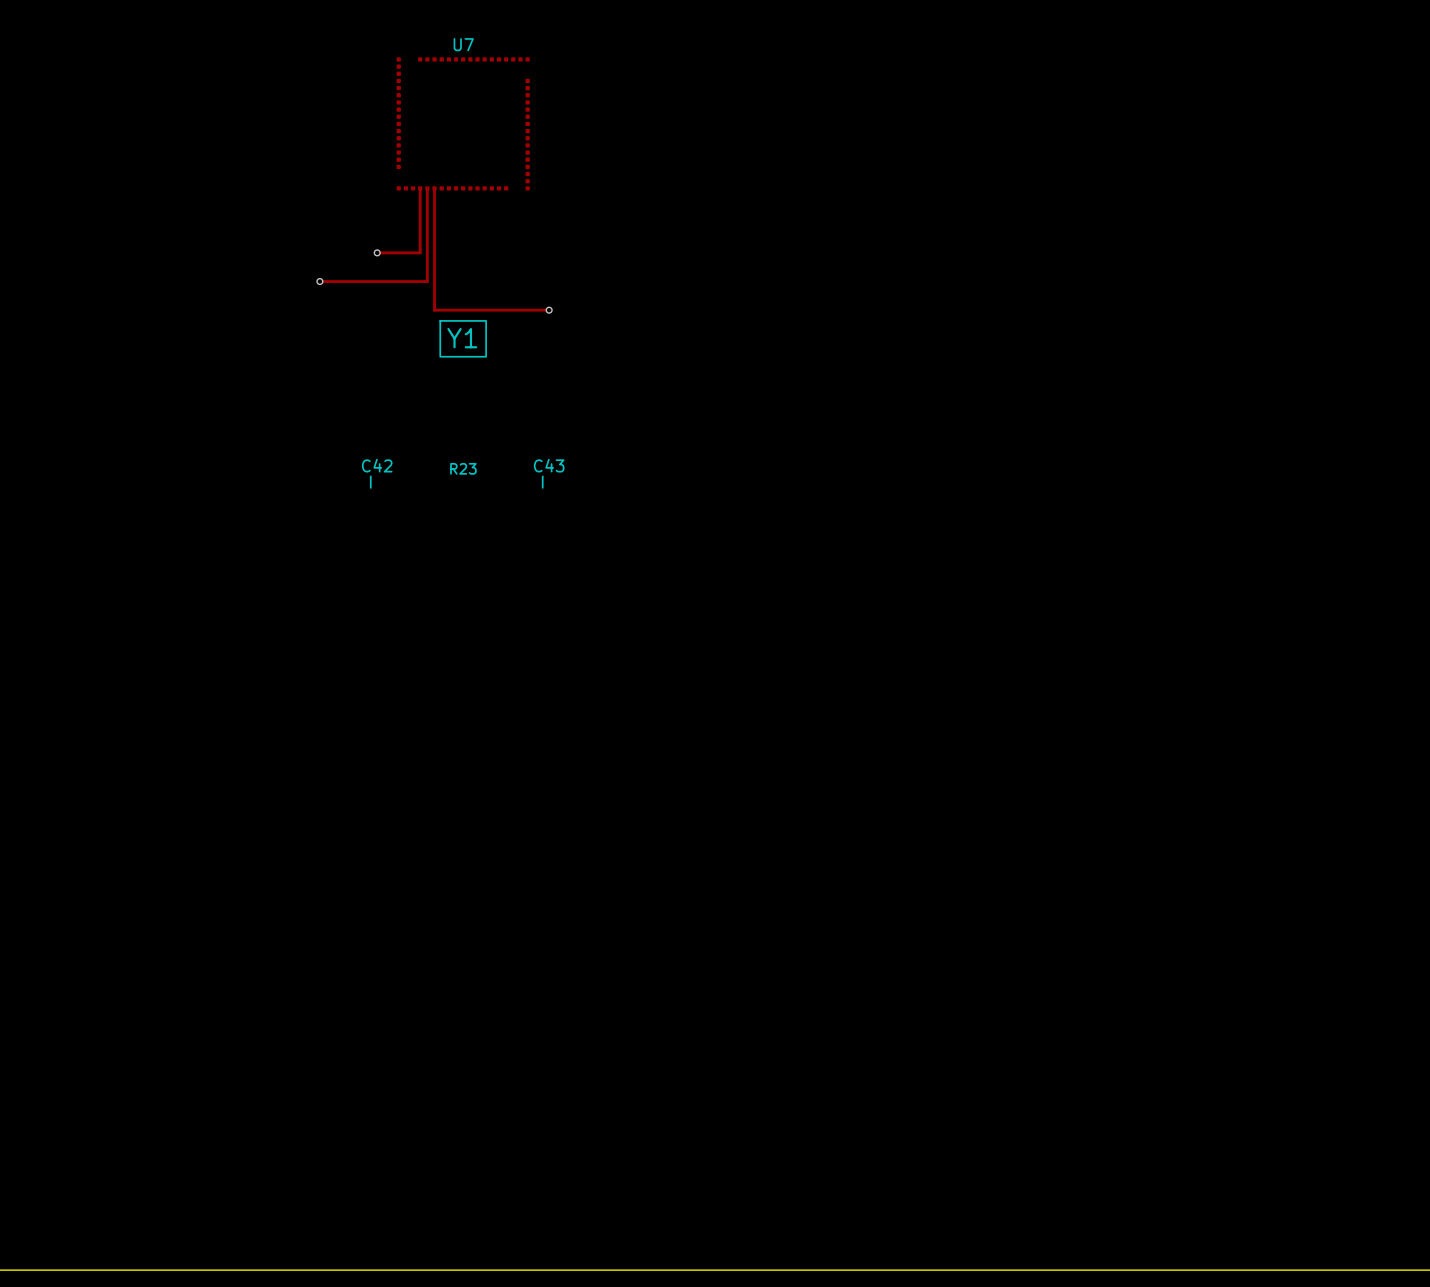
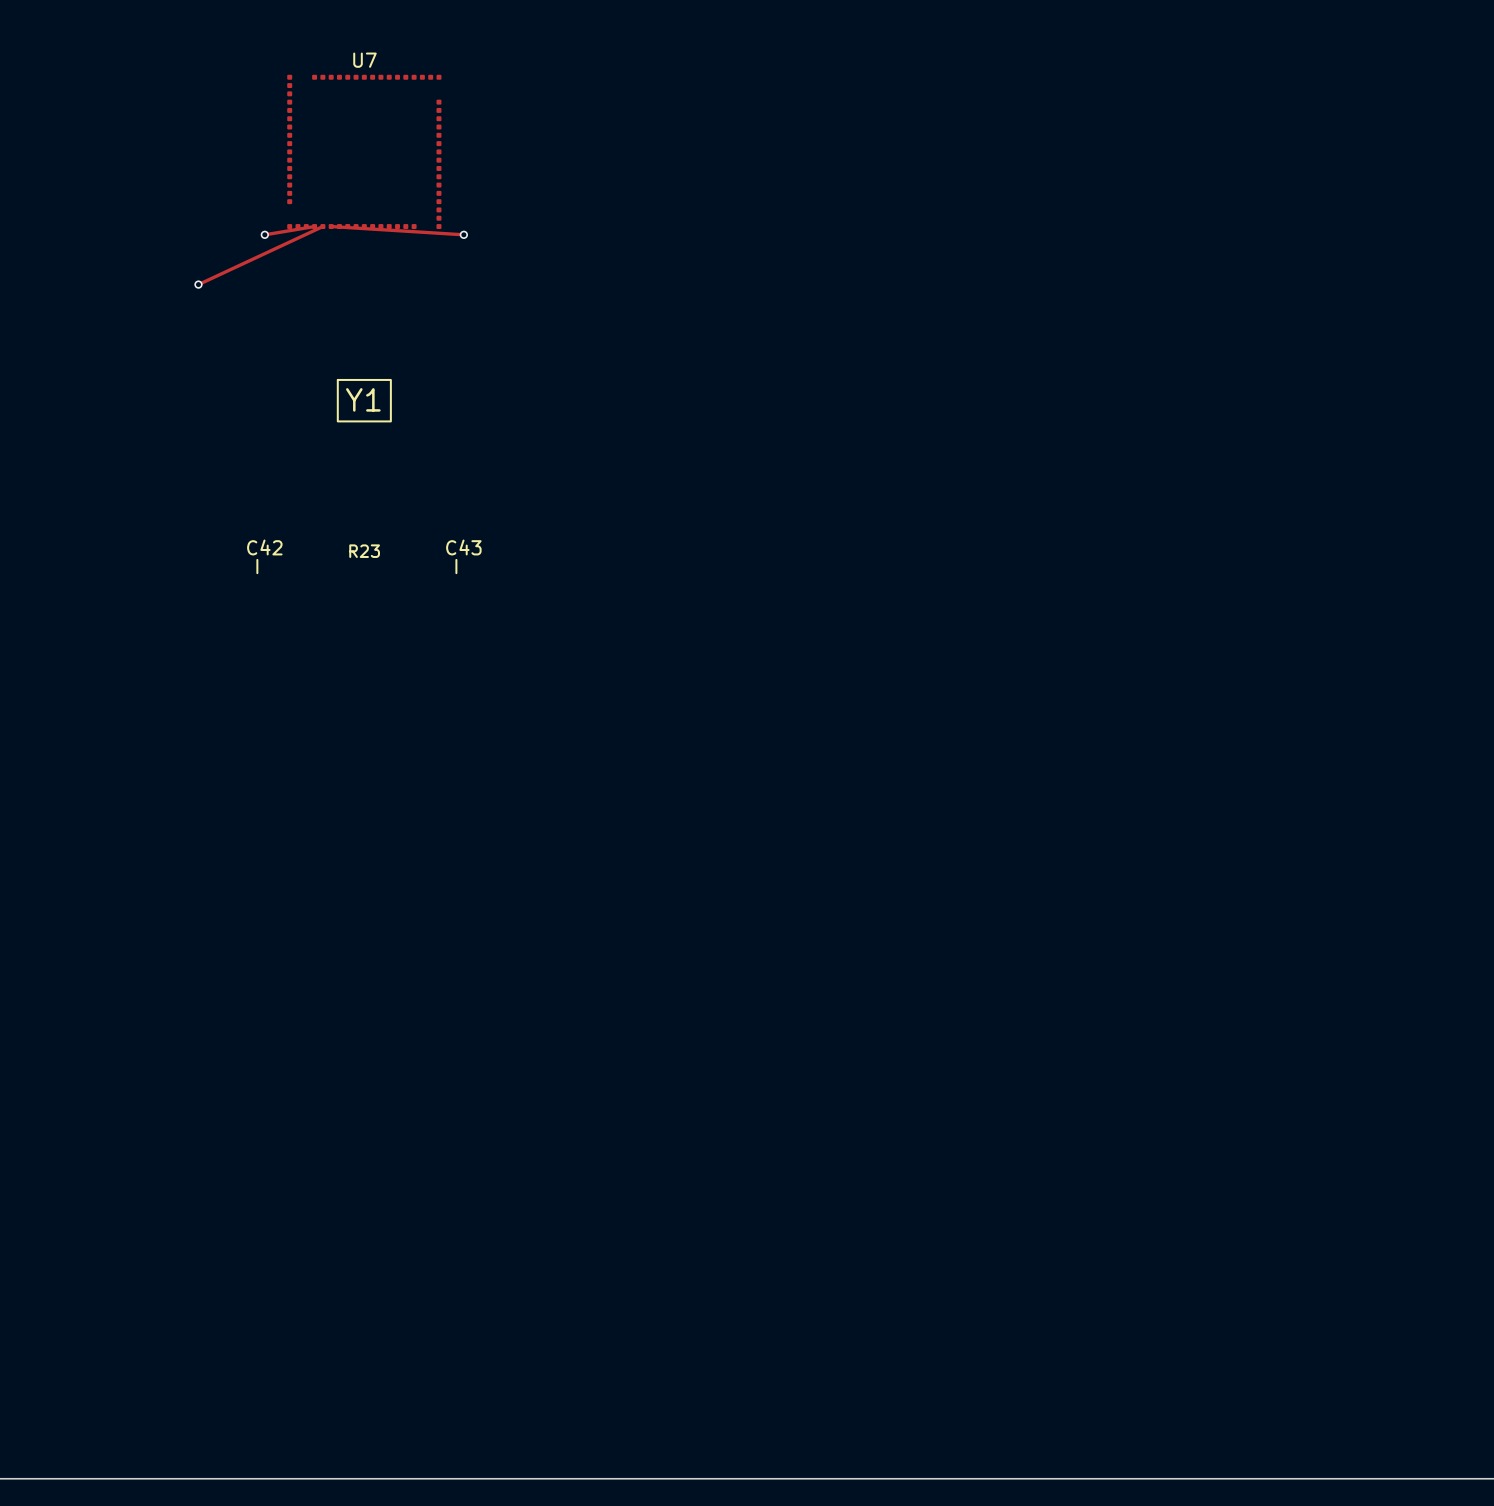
track: (420, 188) (420, 252) (377, 252) -> (314, 226) (264, 234)
track: (427, 188) (427, 281) (319, 281) -> (322, 226) (198, 284)
track: (434, 188) (434, 310) (549, 310) -> (331, 226) (463, 234)
via: none -> (264, 234)
via: none -> (463, 234)
via: none -> (198, 284)
via: (377, 252) -> none
via: (319, 281) -> none
via: (549, 310) -> none

